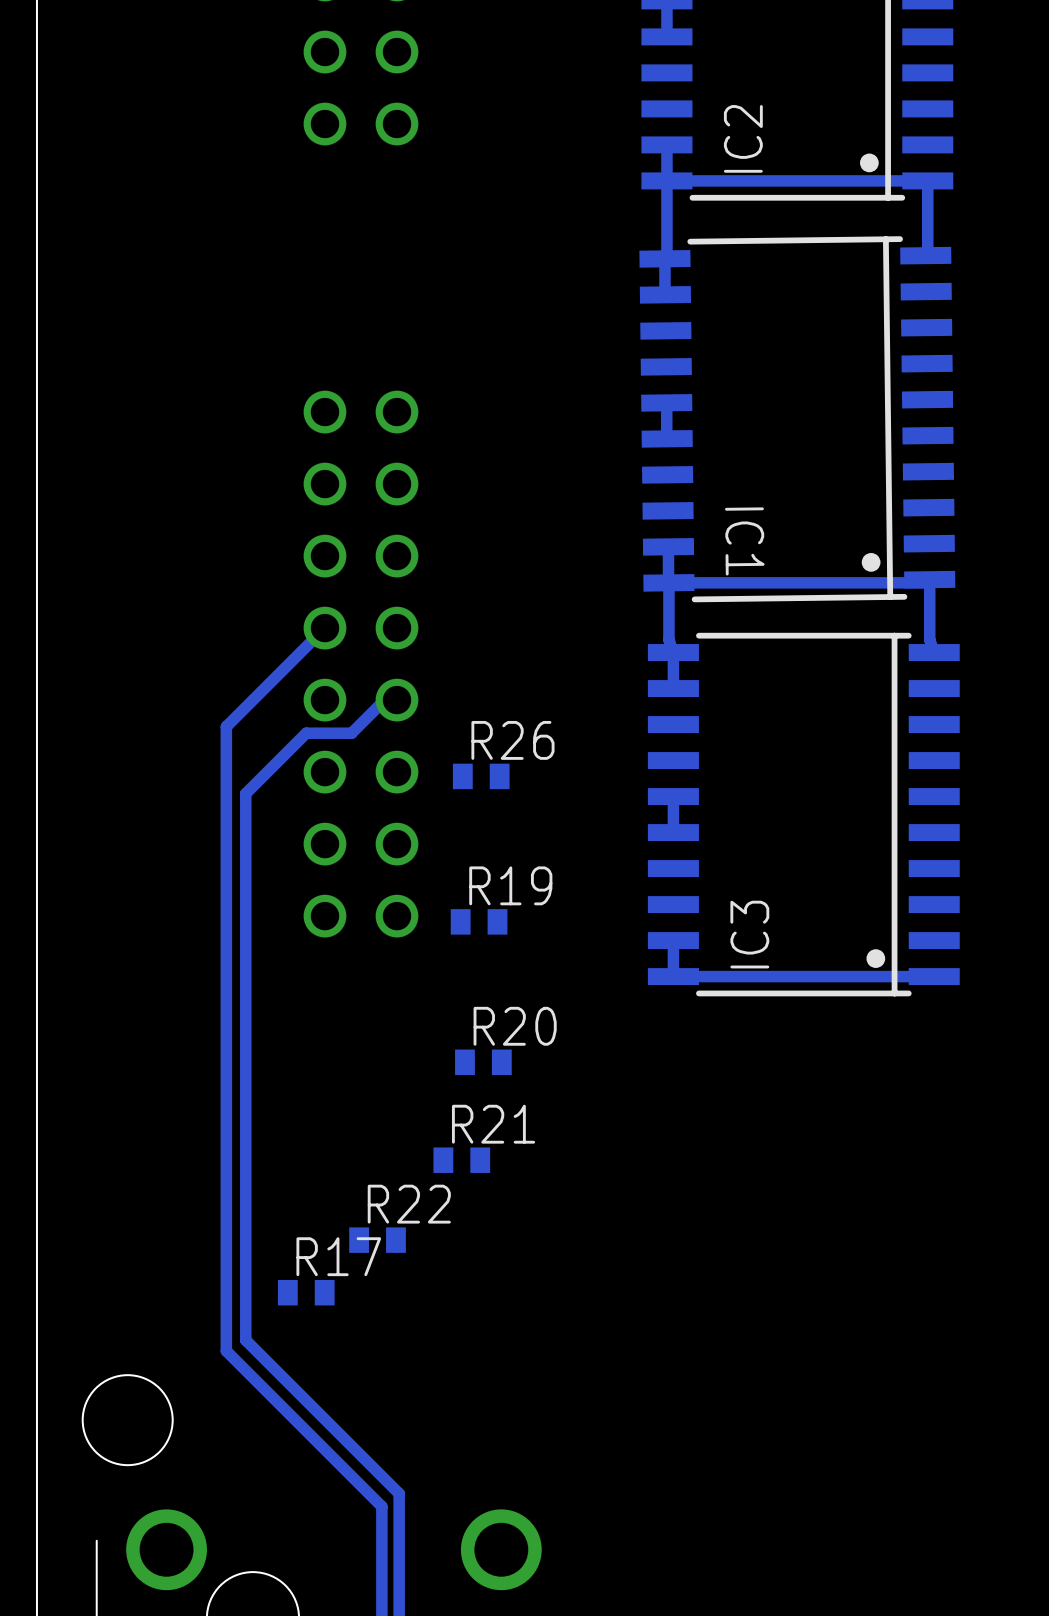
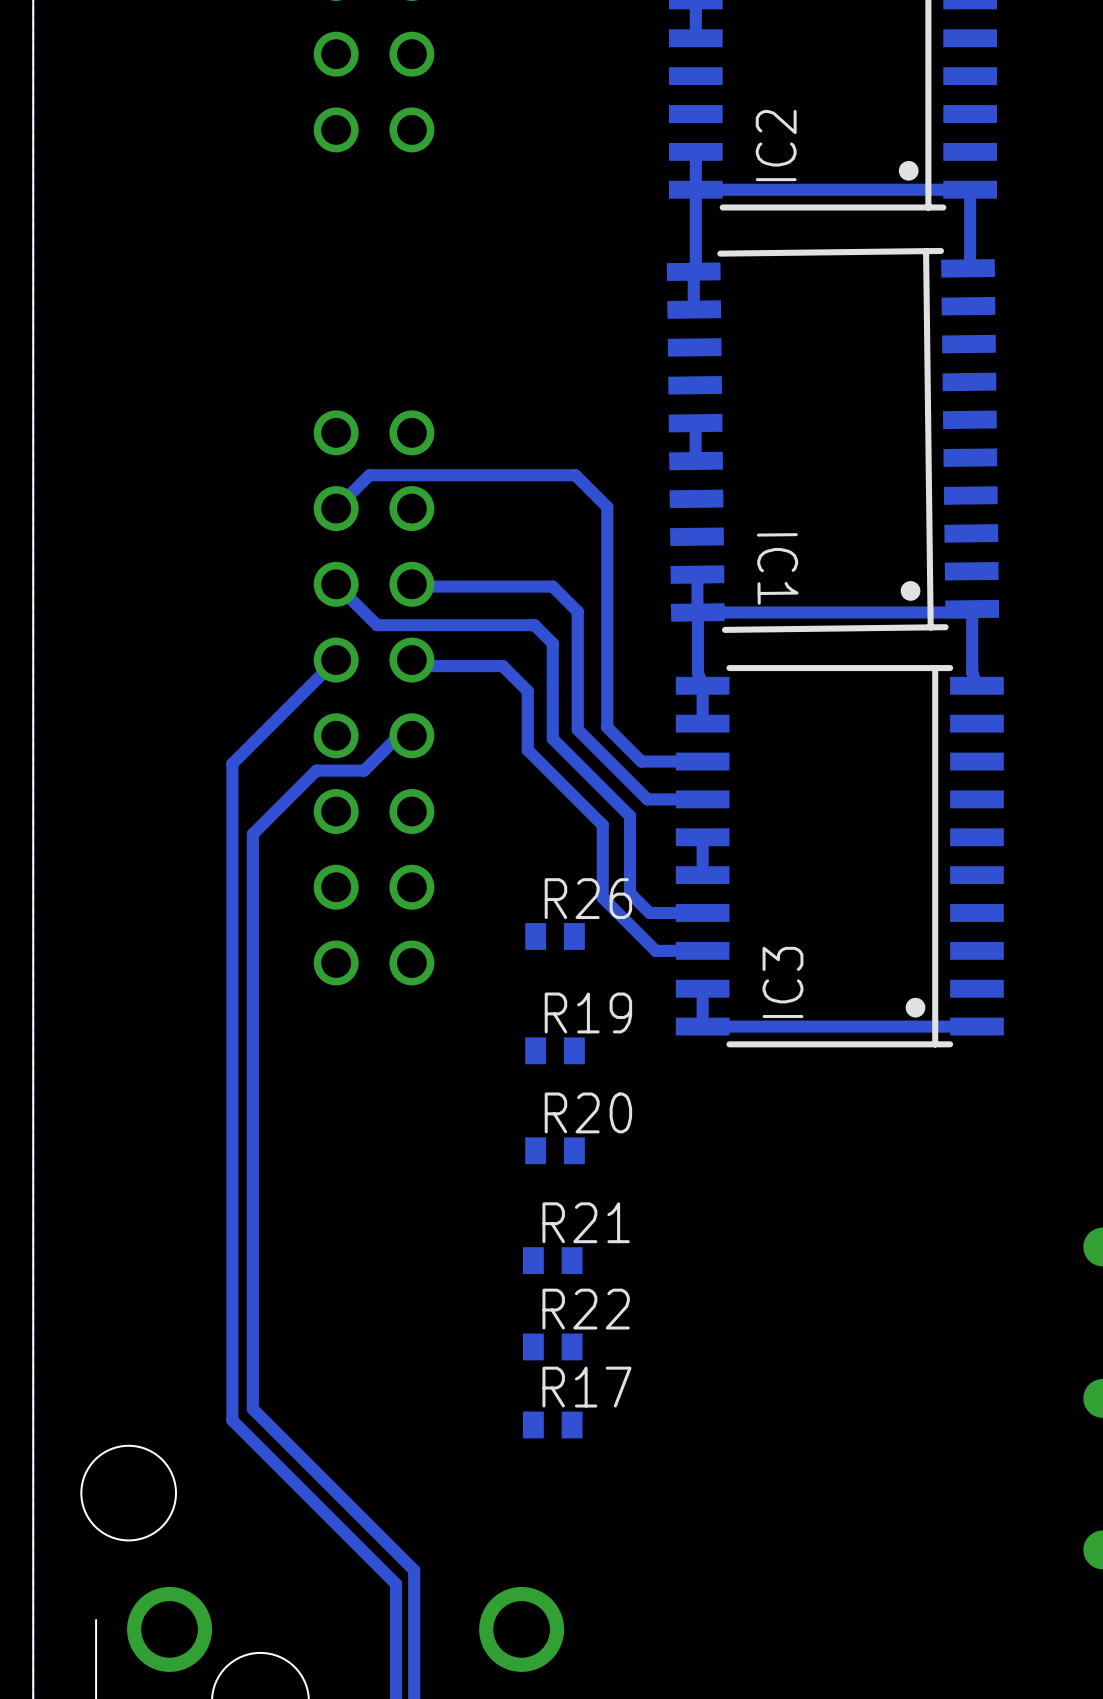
track: none -> (336, 508) (369, 475) (575, 475) (607, 507) (607, 727) (641, 761) (702, 761)
track: none -> (336, 584) (377, 625) (534, 625) (552, 643) (552, 738) (630, 816) (630, 893) (649, 912) (702, 912)
track: none -> (411, 584) (414, 586) (552, 586) (577, 611) (577, 729) (647, 799) (702, 799)
track: none -> (411, 660) (417, 666) (502, 666) (527, 691) (527, 750) (602, 825) (602, 897) (655, 950) (702, 950)
R26 position: (481, 776) -> (555, 936)
R19 position: (479, 921) -> (555, 1050)
R20 position: (483, 1062) -> (555, 1150)
R21 position: (461, 1160) -> (552, 1260)
R22 position: (377, 1240) -> (552, 1346)
R17 position: (306, 1292) -> (552, 1424)

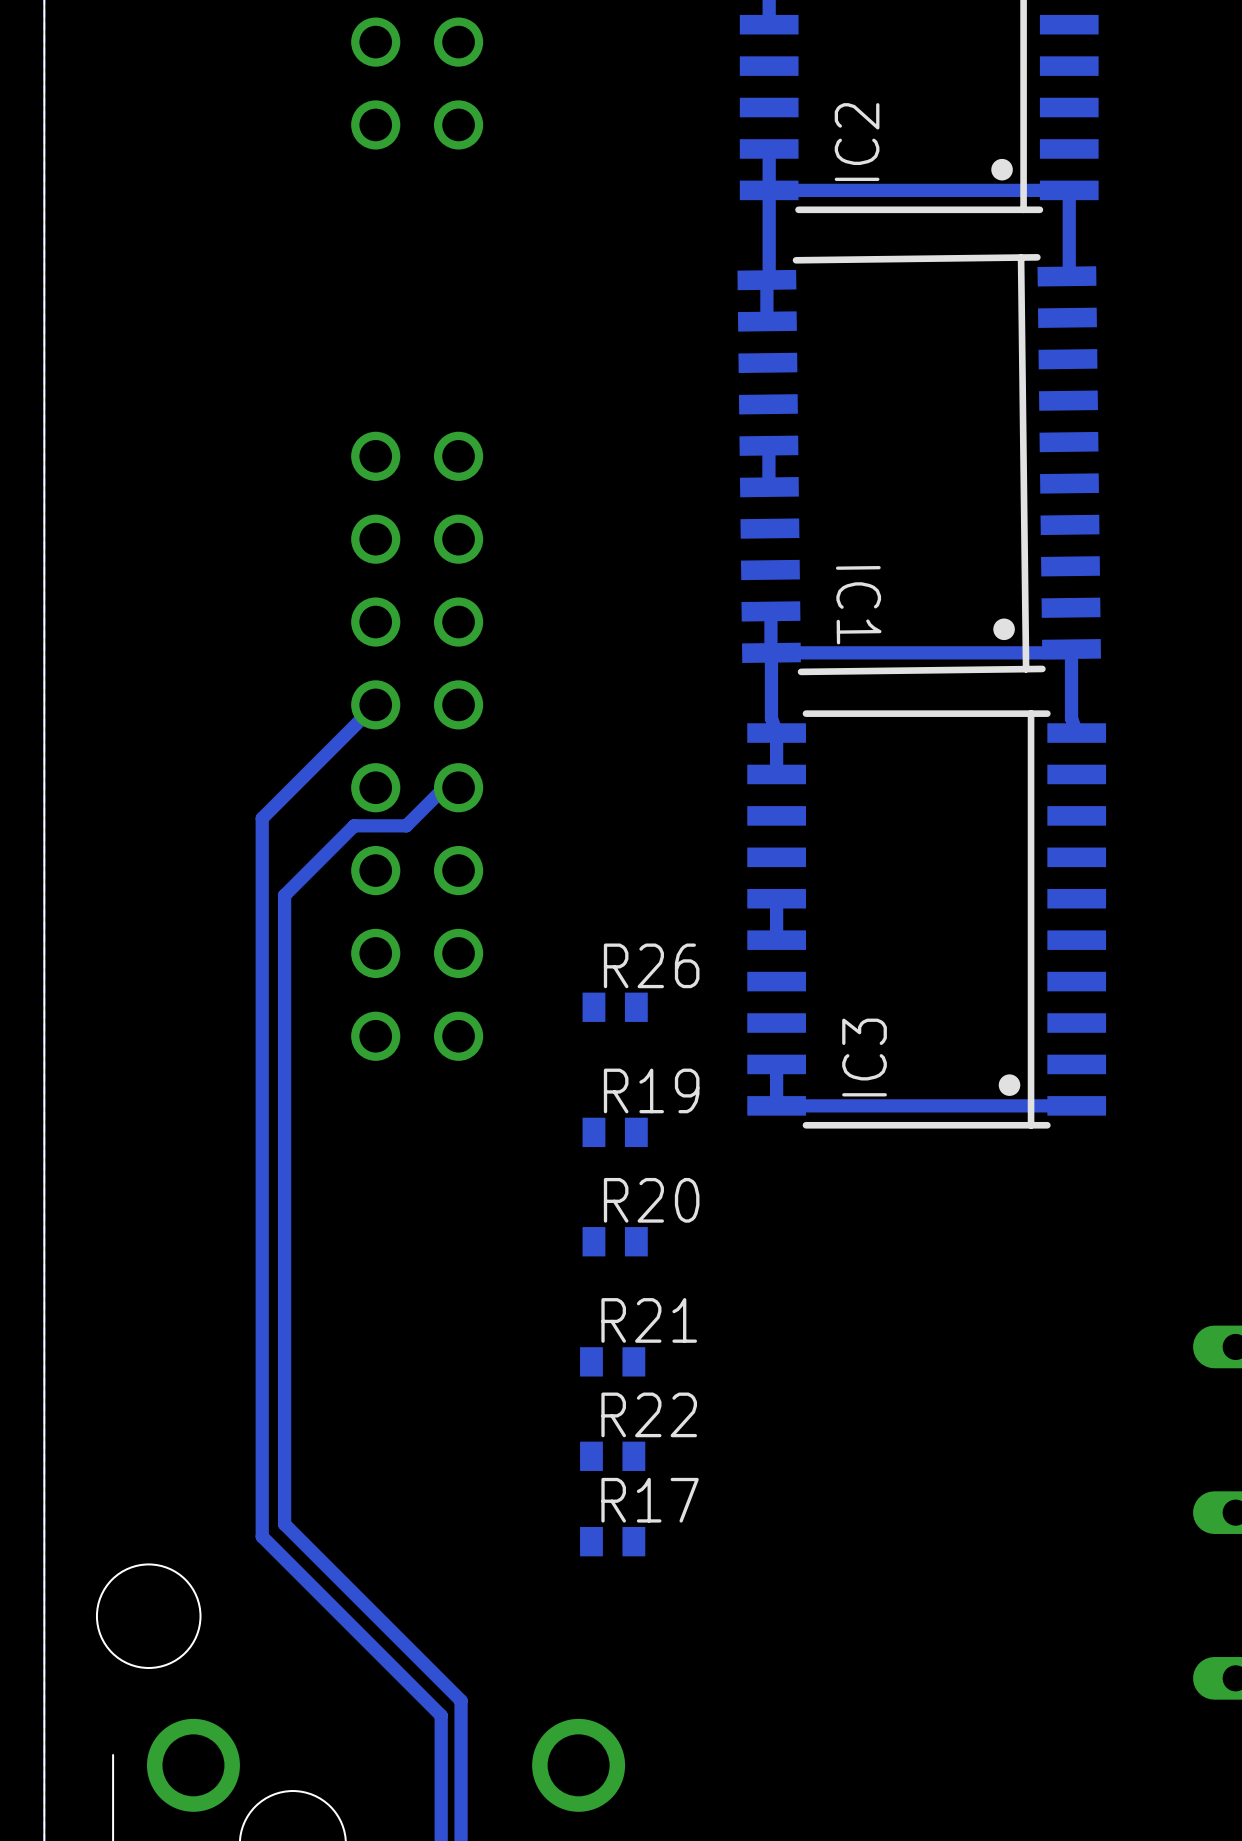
track: (336, 508) (369, 475) (575, 475) (607, 507) (607, 727) (641, 761) (702, 761) -> none
track: (336, 584) (377, 625) (534, 625) (552, 643) (552, 738) (630, 816) (630, 893) (649, 912) (702, 912) -> none
track: (411, 584) (414, 586) (552, 586) (577, 611) (577, 729) (647, 799) (702, 799) -> none
track: (411, 660) (417, 666) (502, 666) (527, 691) (527, 750) (602, 825) (602, 897) (655, 950) (702, 950) -> none

